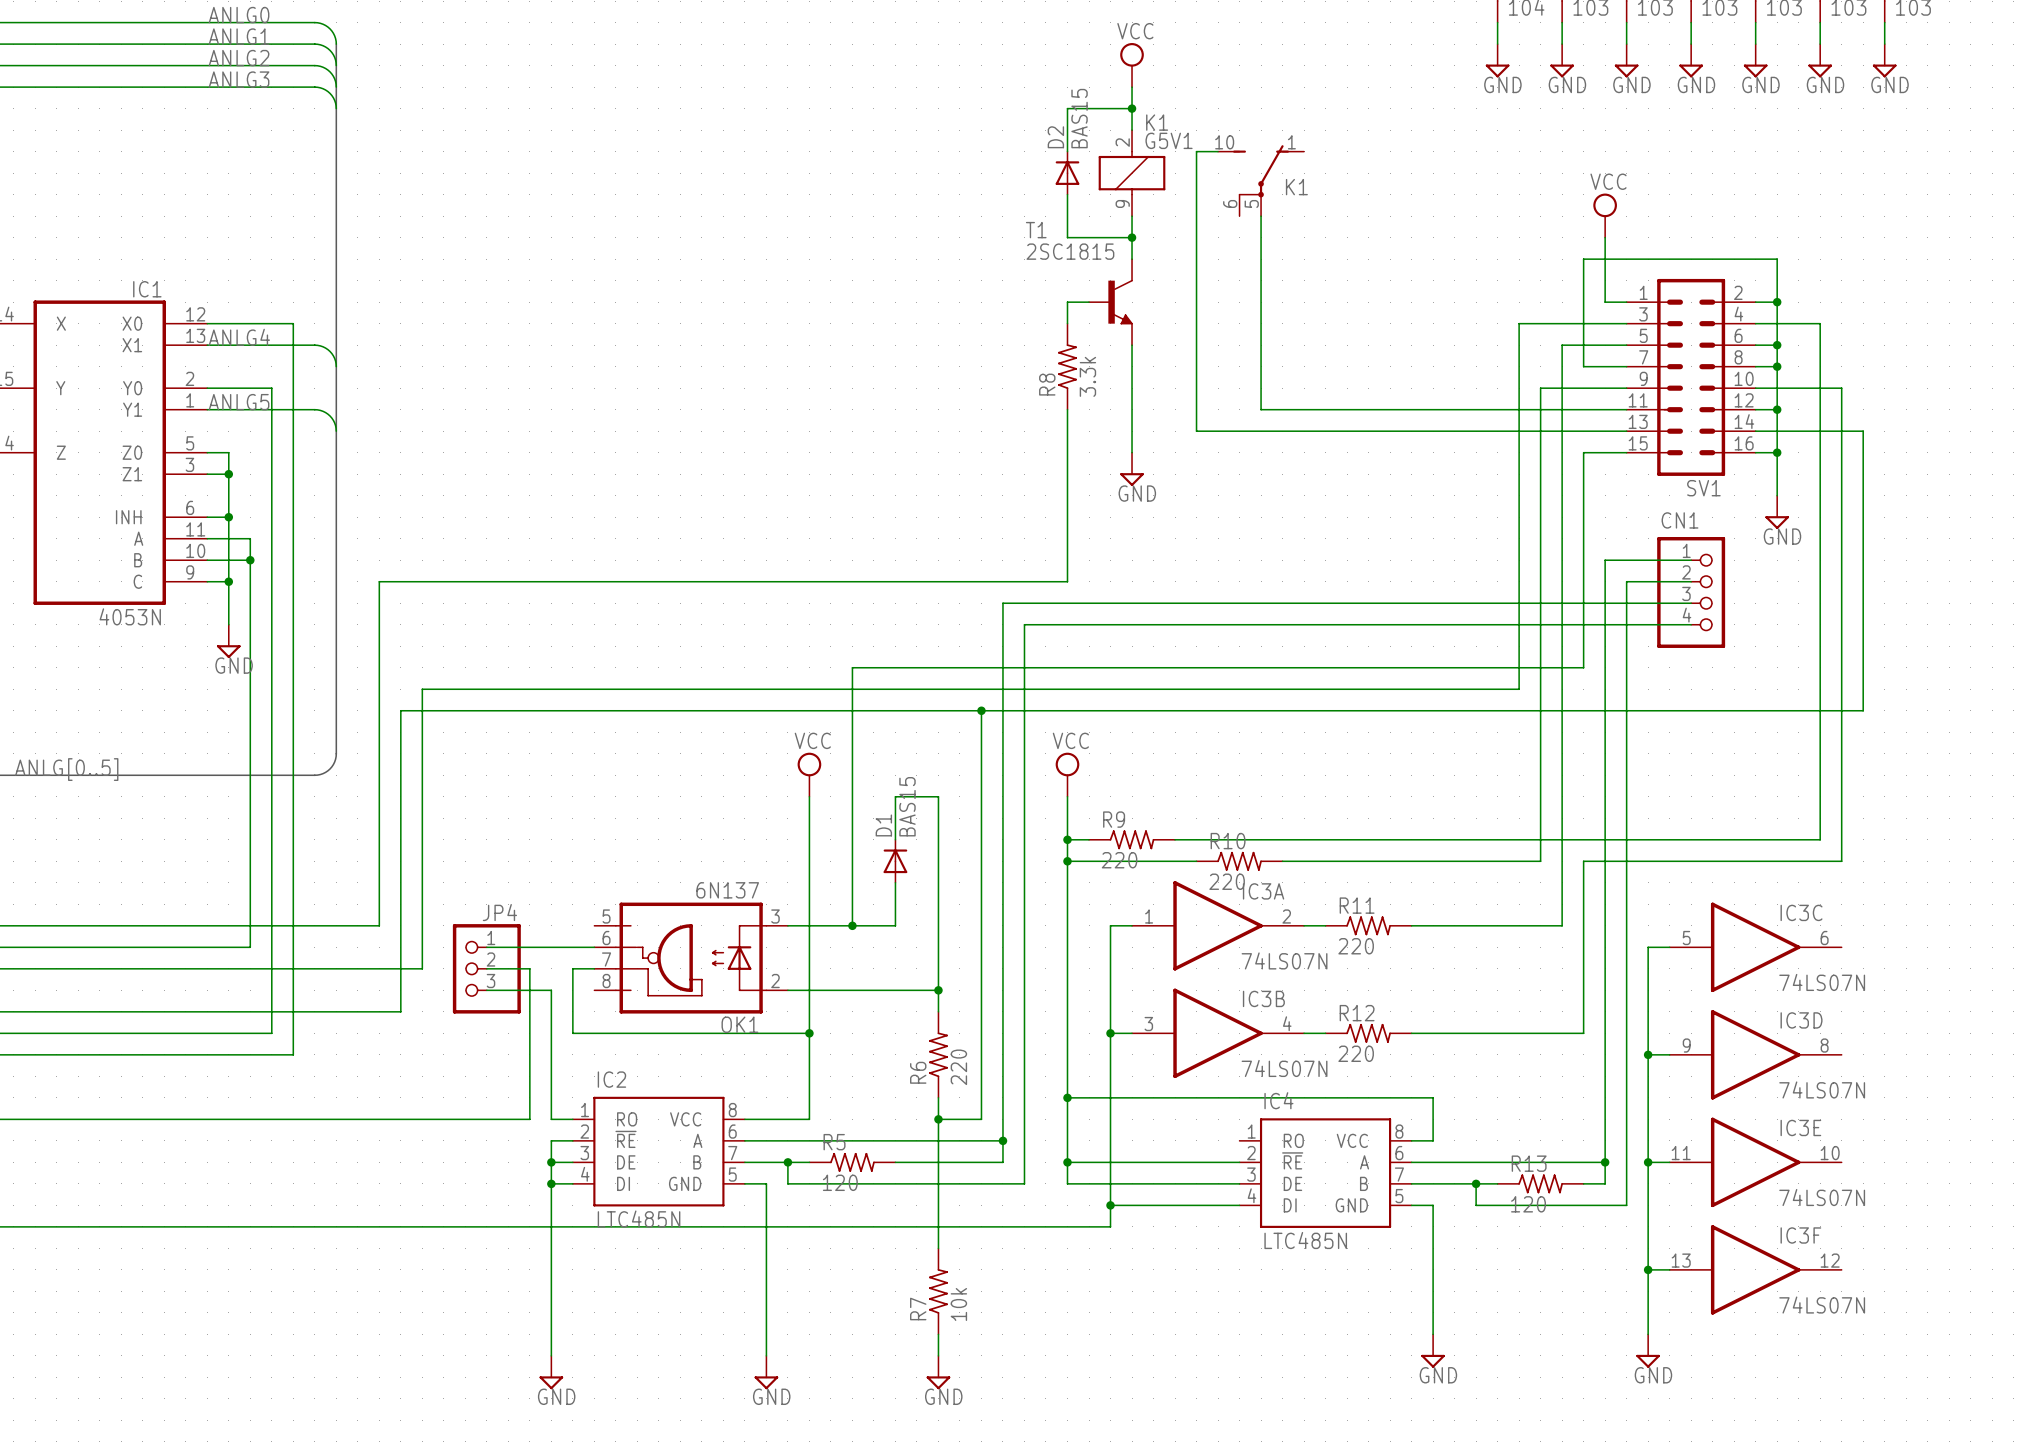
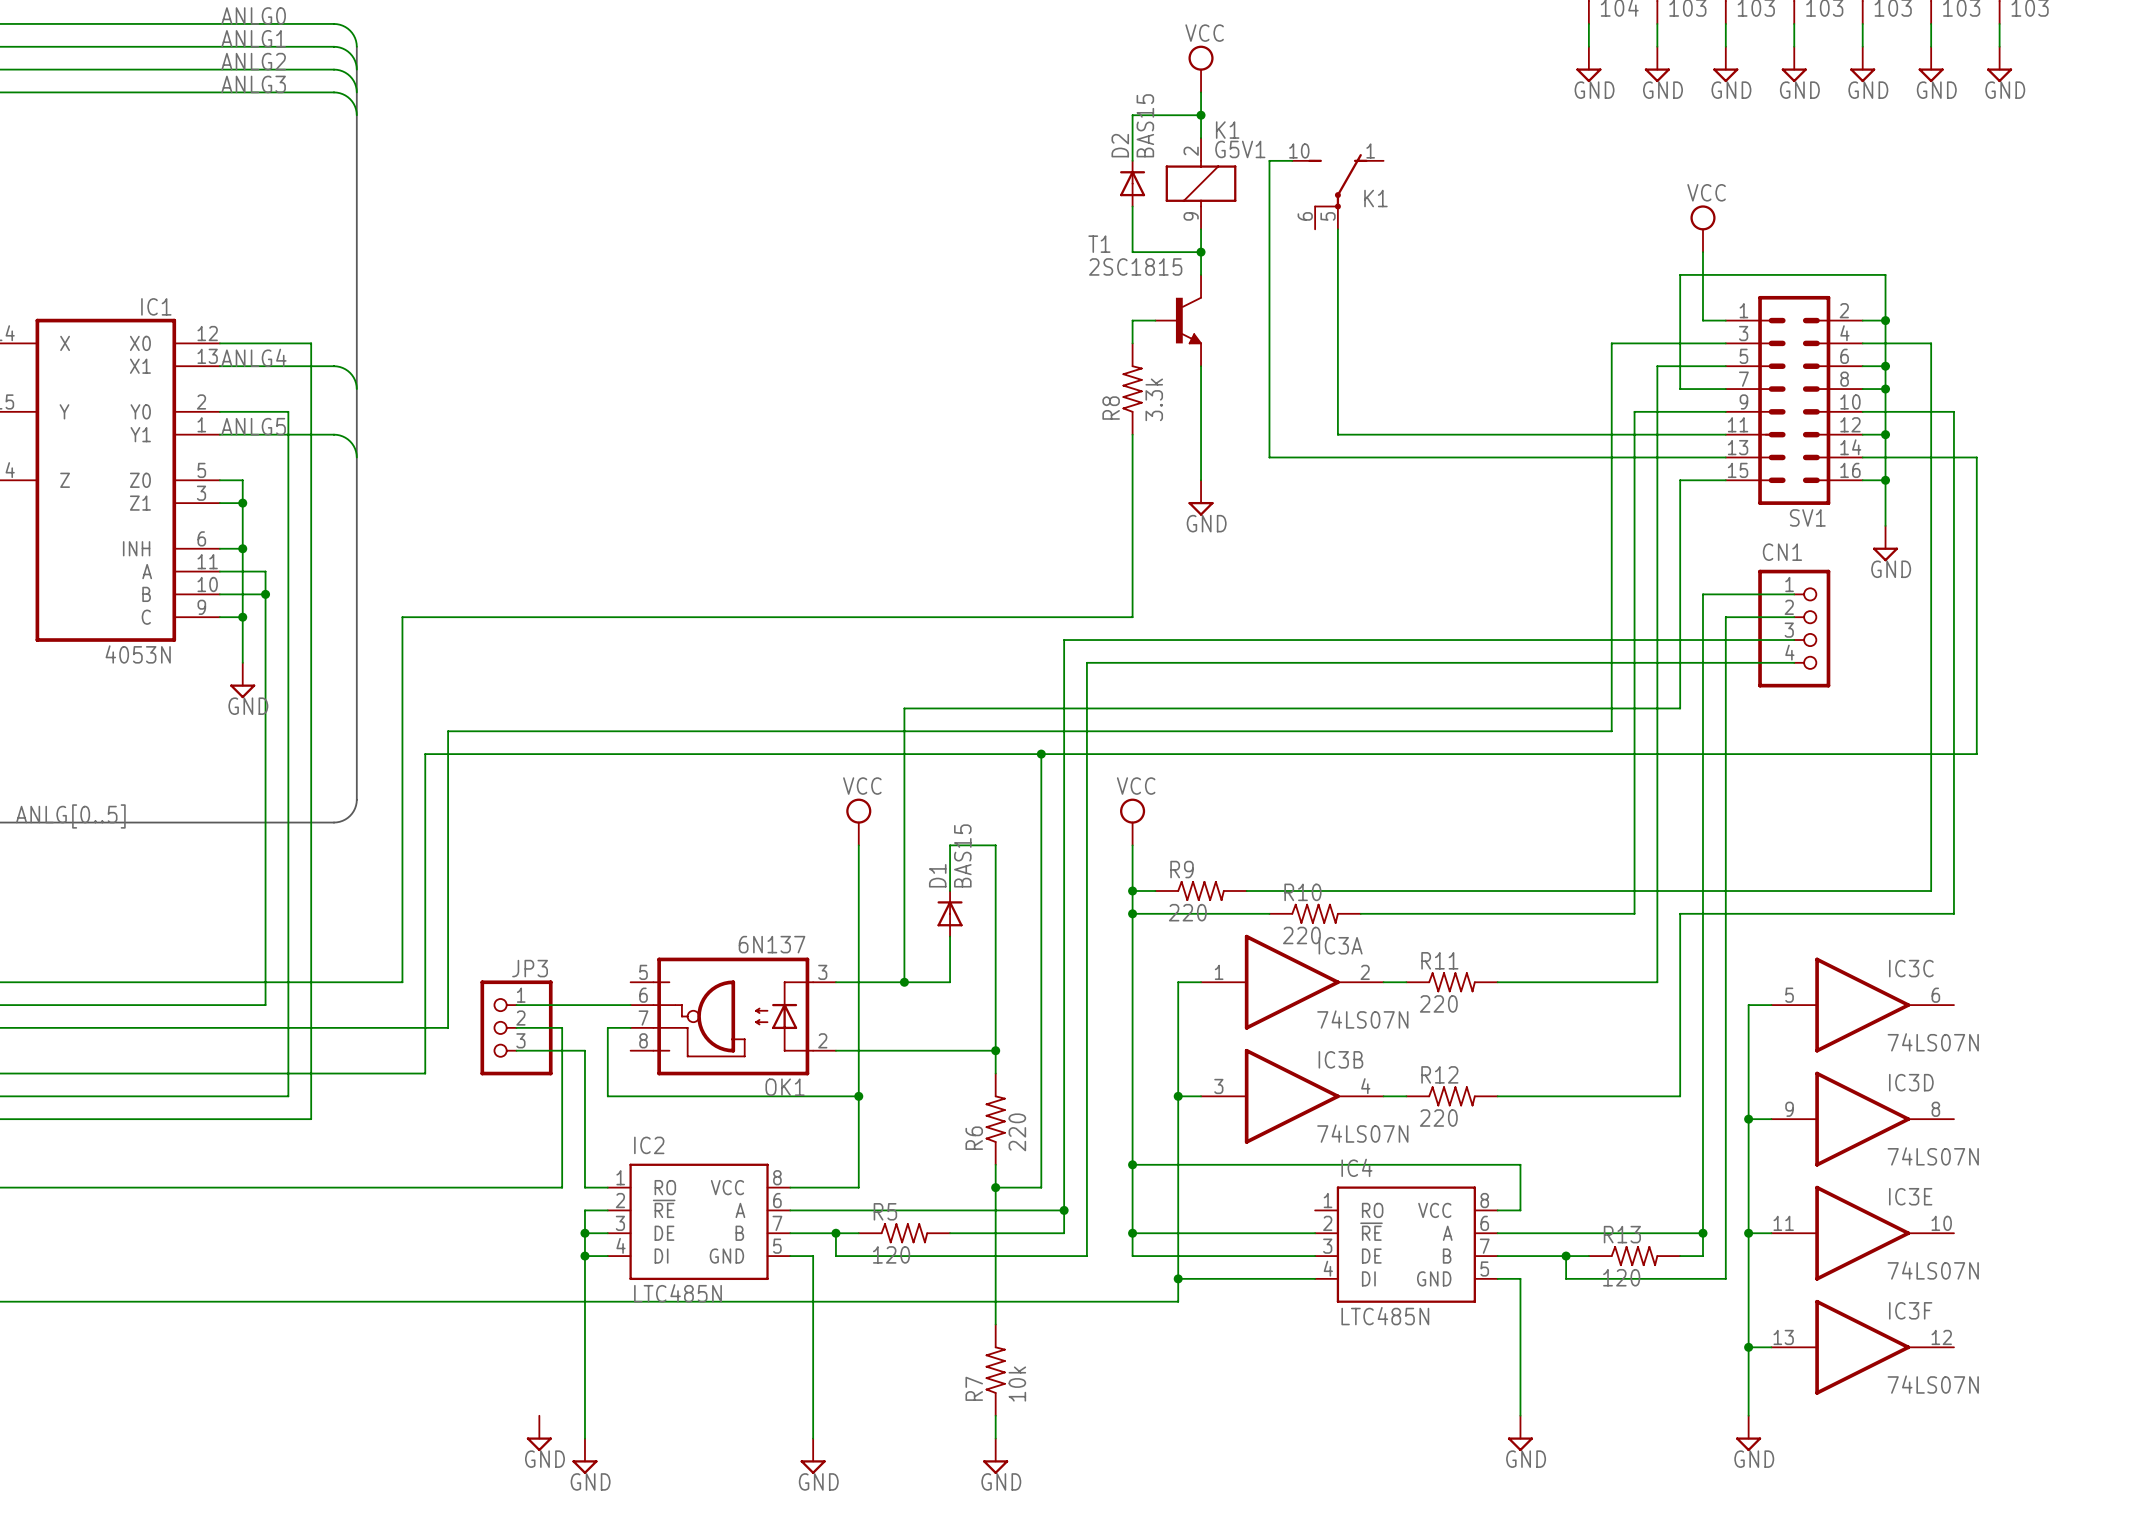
JP4 name: JP4 (499, 912) -> JP3 (530, 968)
power symbol: none -> GND (539, 1433)

